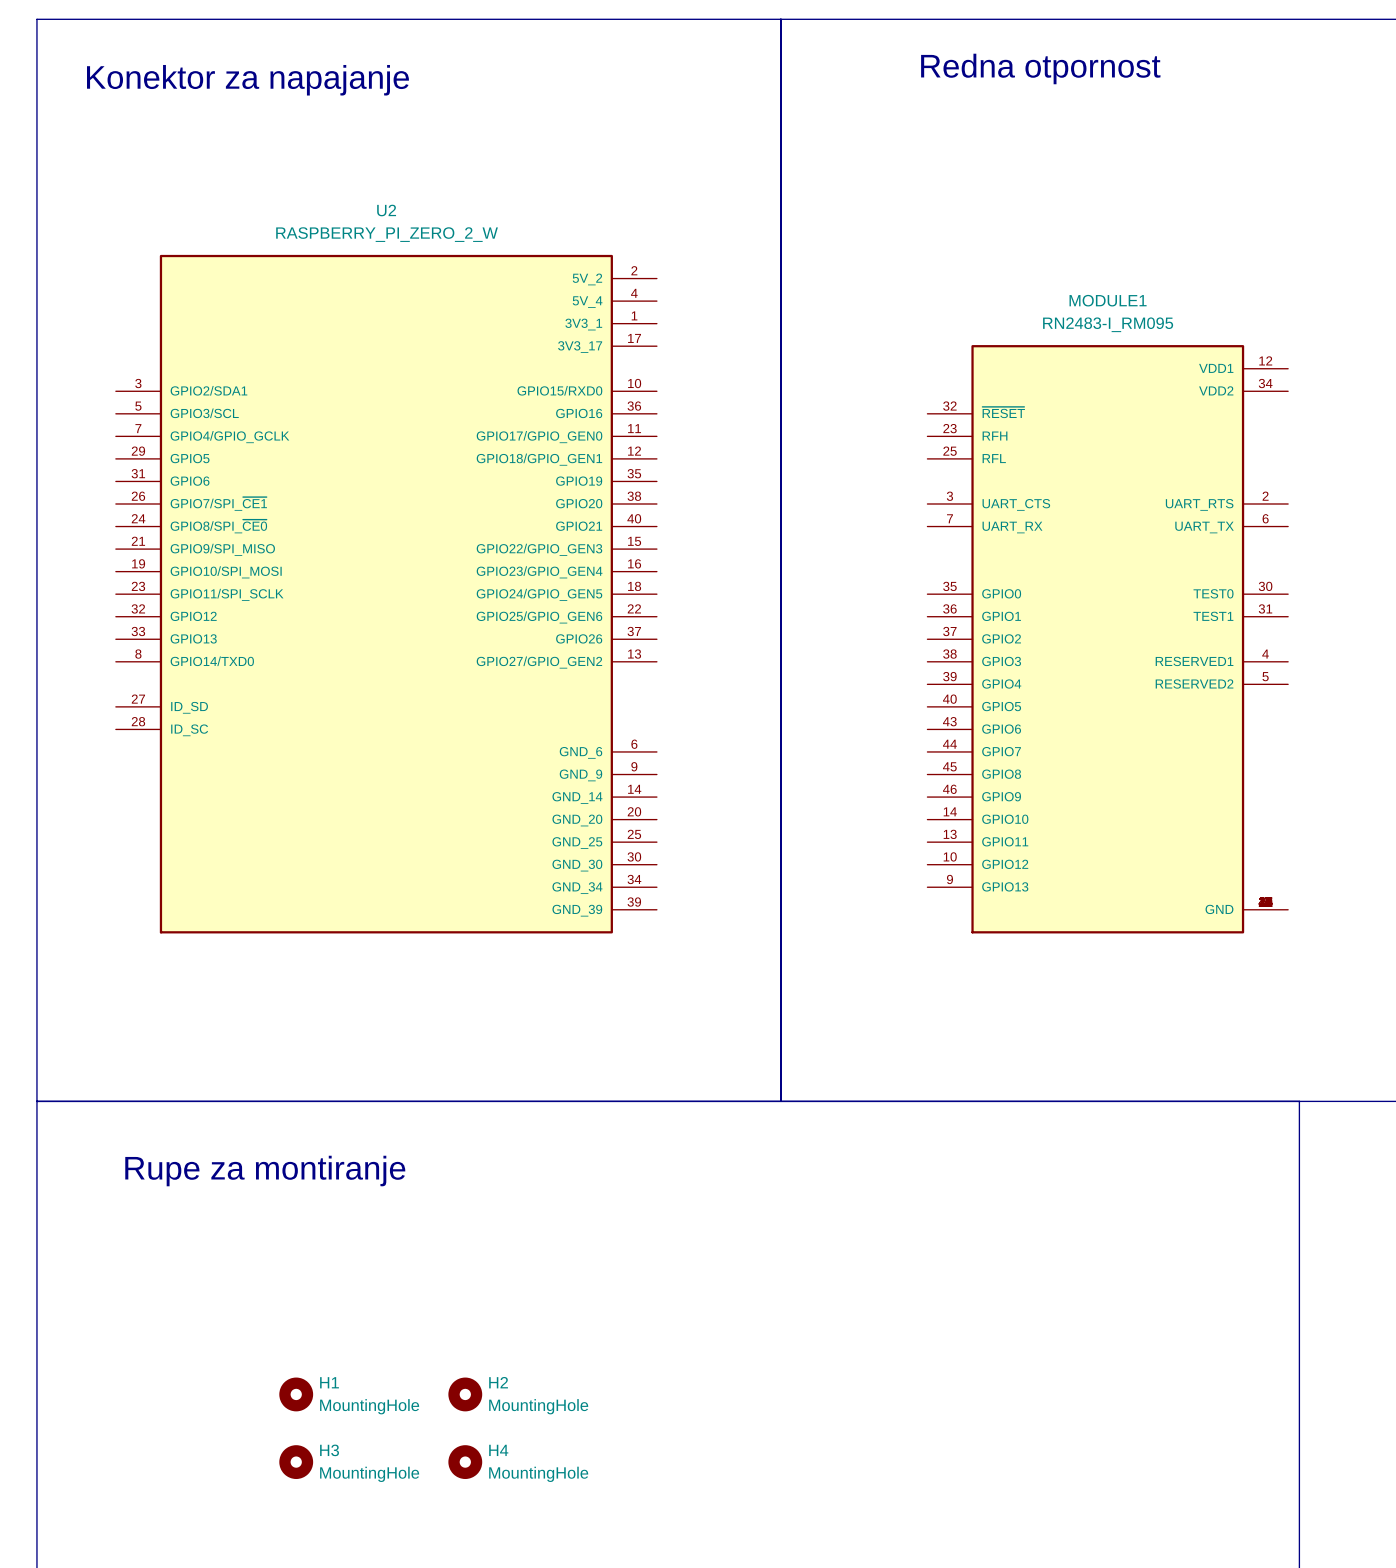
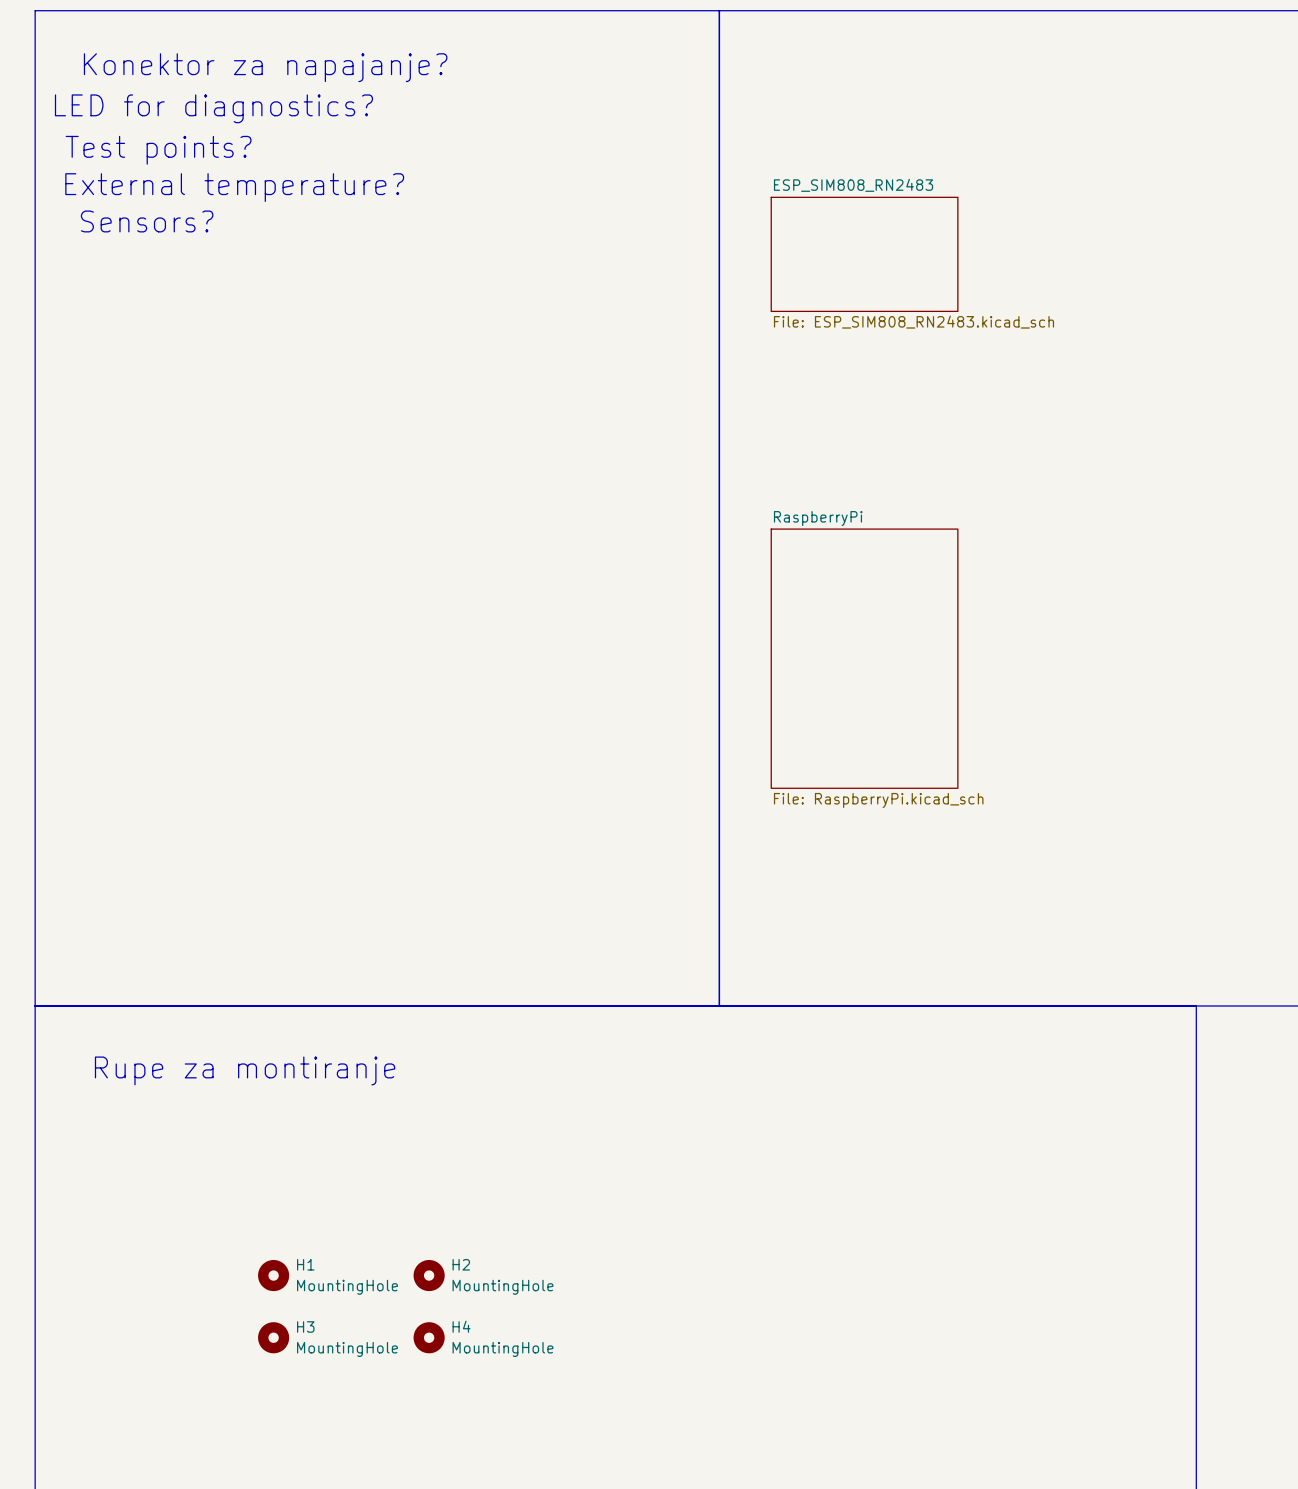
text: Redna otpornost (1040, 68) -> none
text: Konektor za napajanje (247, 80) -> Konektor za napajanje? (265, 67)
text: none -> LED for diagnostics? (213, 108)
text: none -> Test points? (158, 150)
text: none -> External temperature? (234, 187)
text: none -> Sensors? (147, 221)
sheet ESP_SIM808_RN2483: none -> File: ESP_SIM808_RN2483.kicad_sch (864, 254)
U2: RASPBERRY_PI_ZERO_2_W (386, 594) -> none
MODULE1: RN2483-I_RM095 (1107, 639) -> none
sheet RaspberryPi: none -> File: RaspberryPi.kicad_sch (864, 658)

